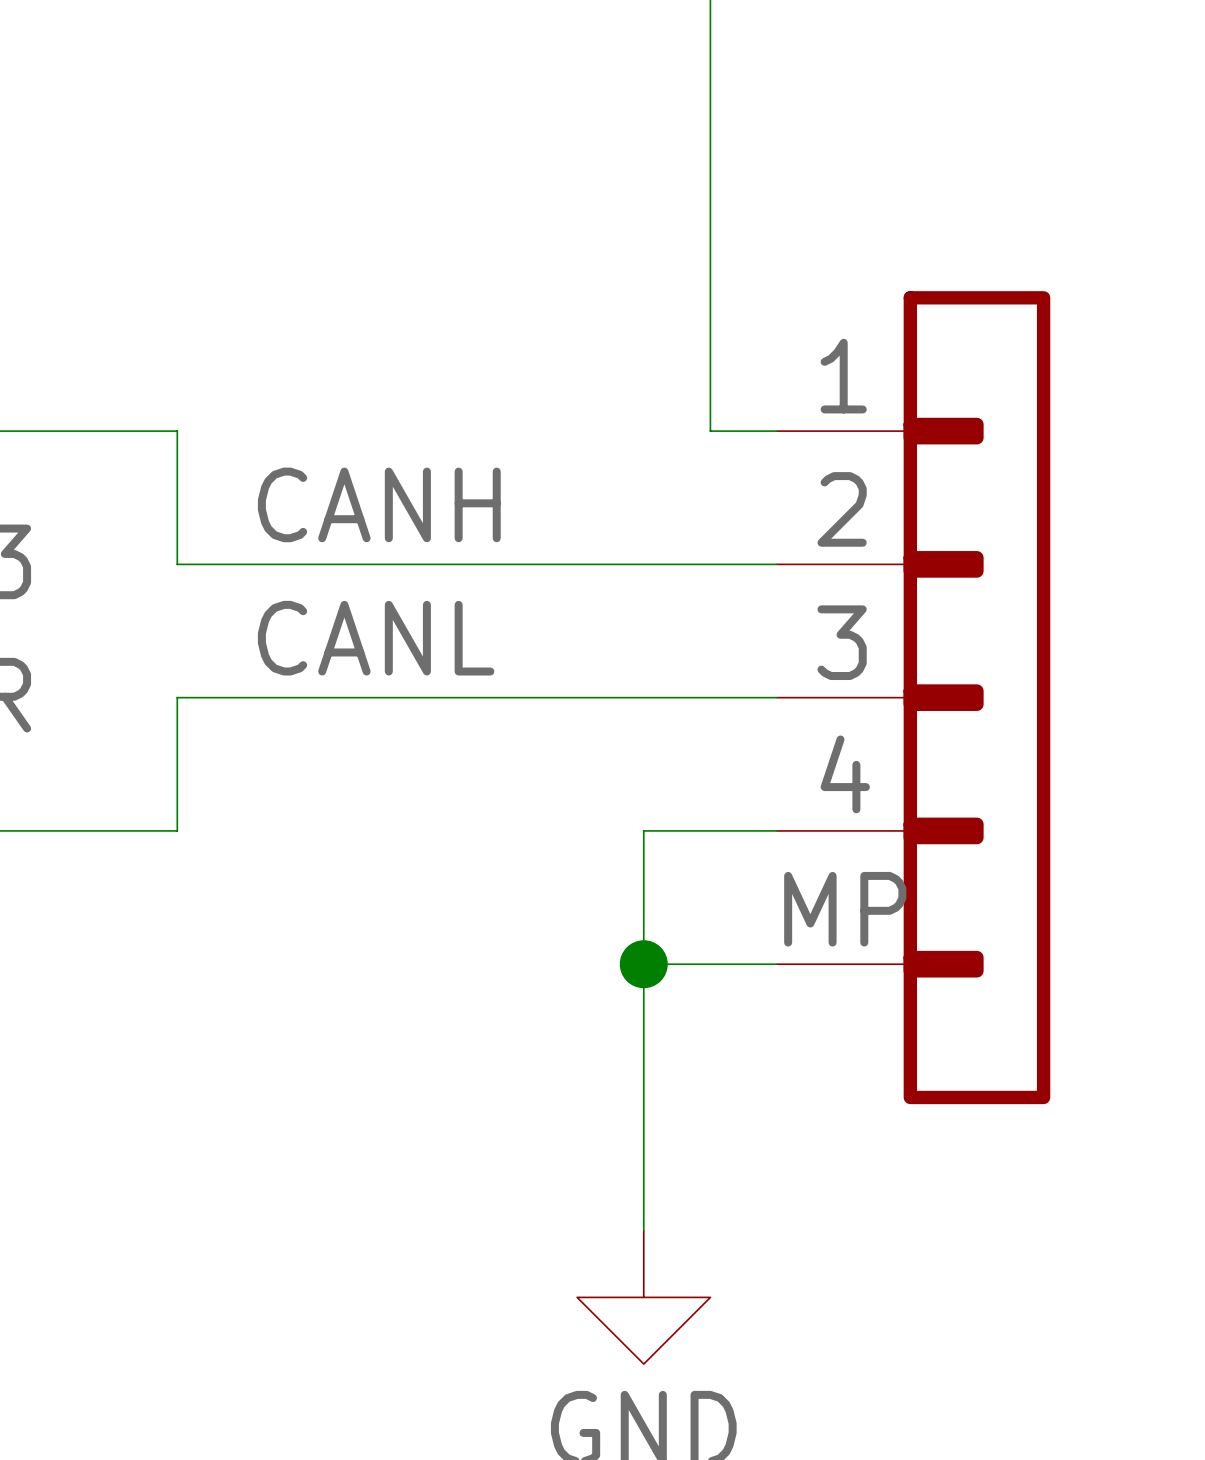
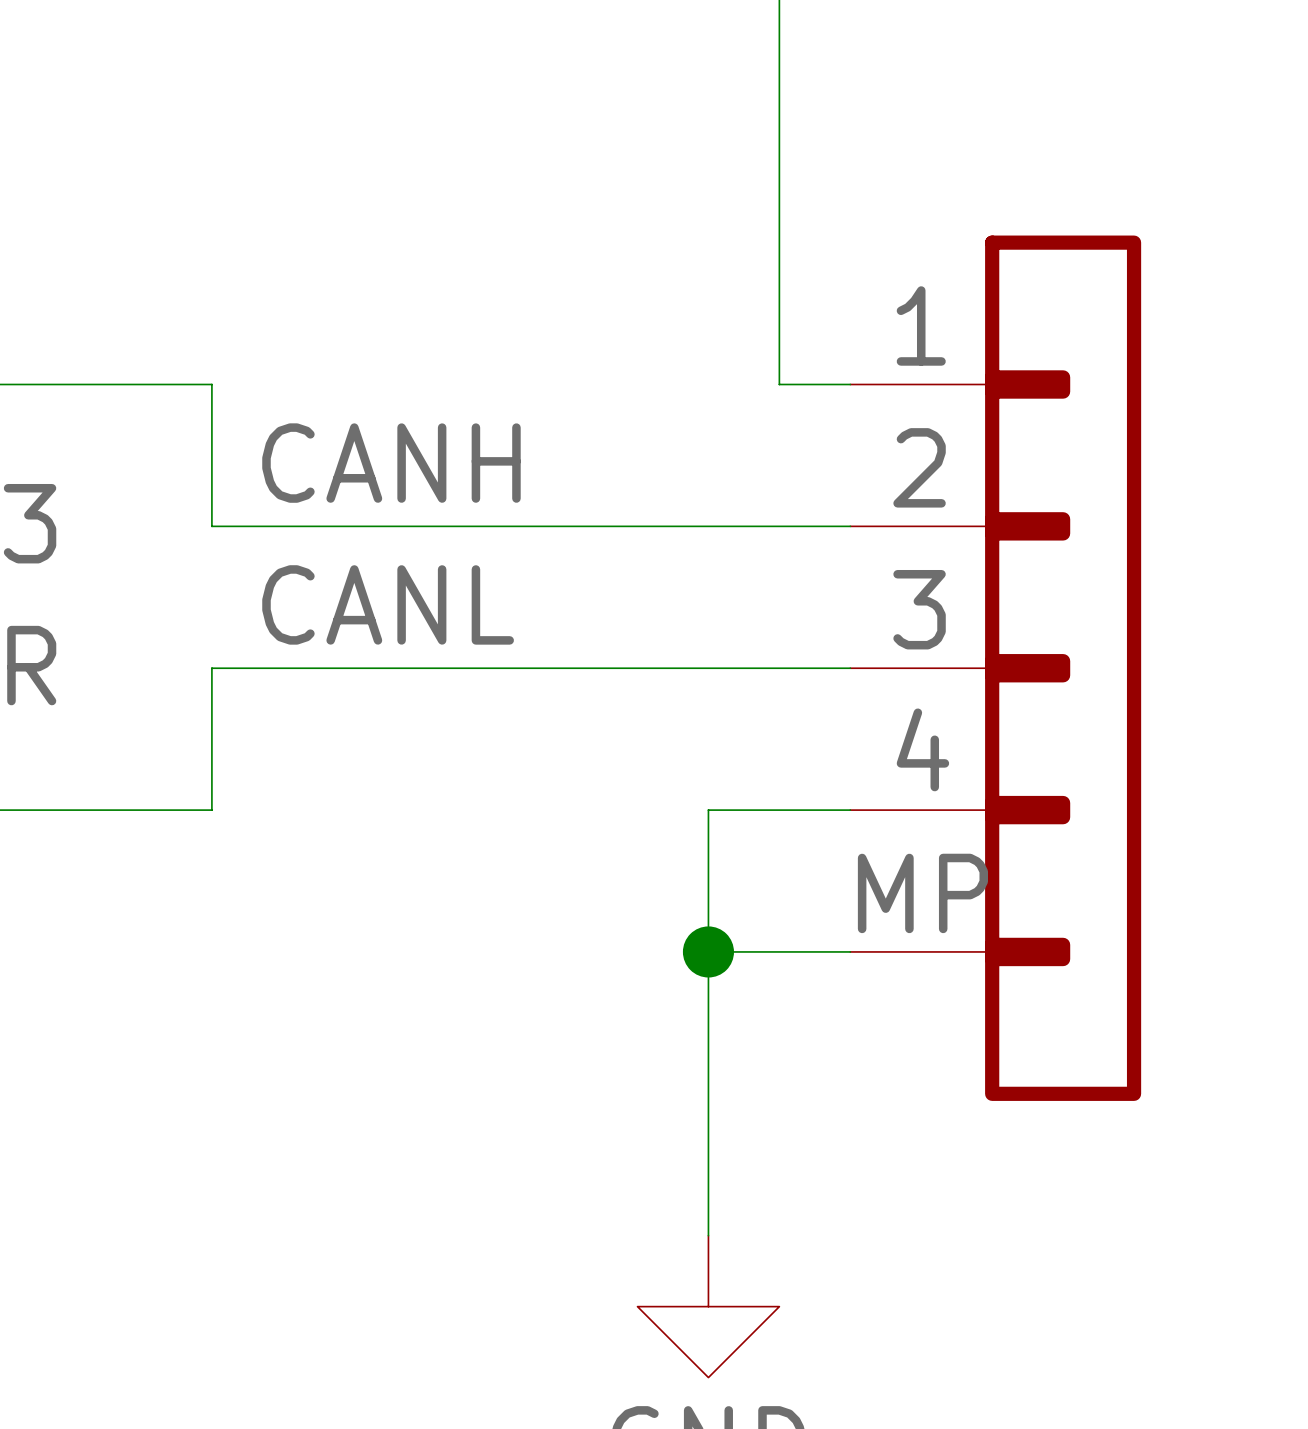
label position: CANH (379, 504) -> CANH (391, 463)
label position: CANL (376, 638) -> CANL (388, 604)

